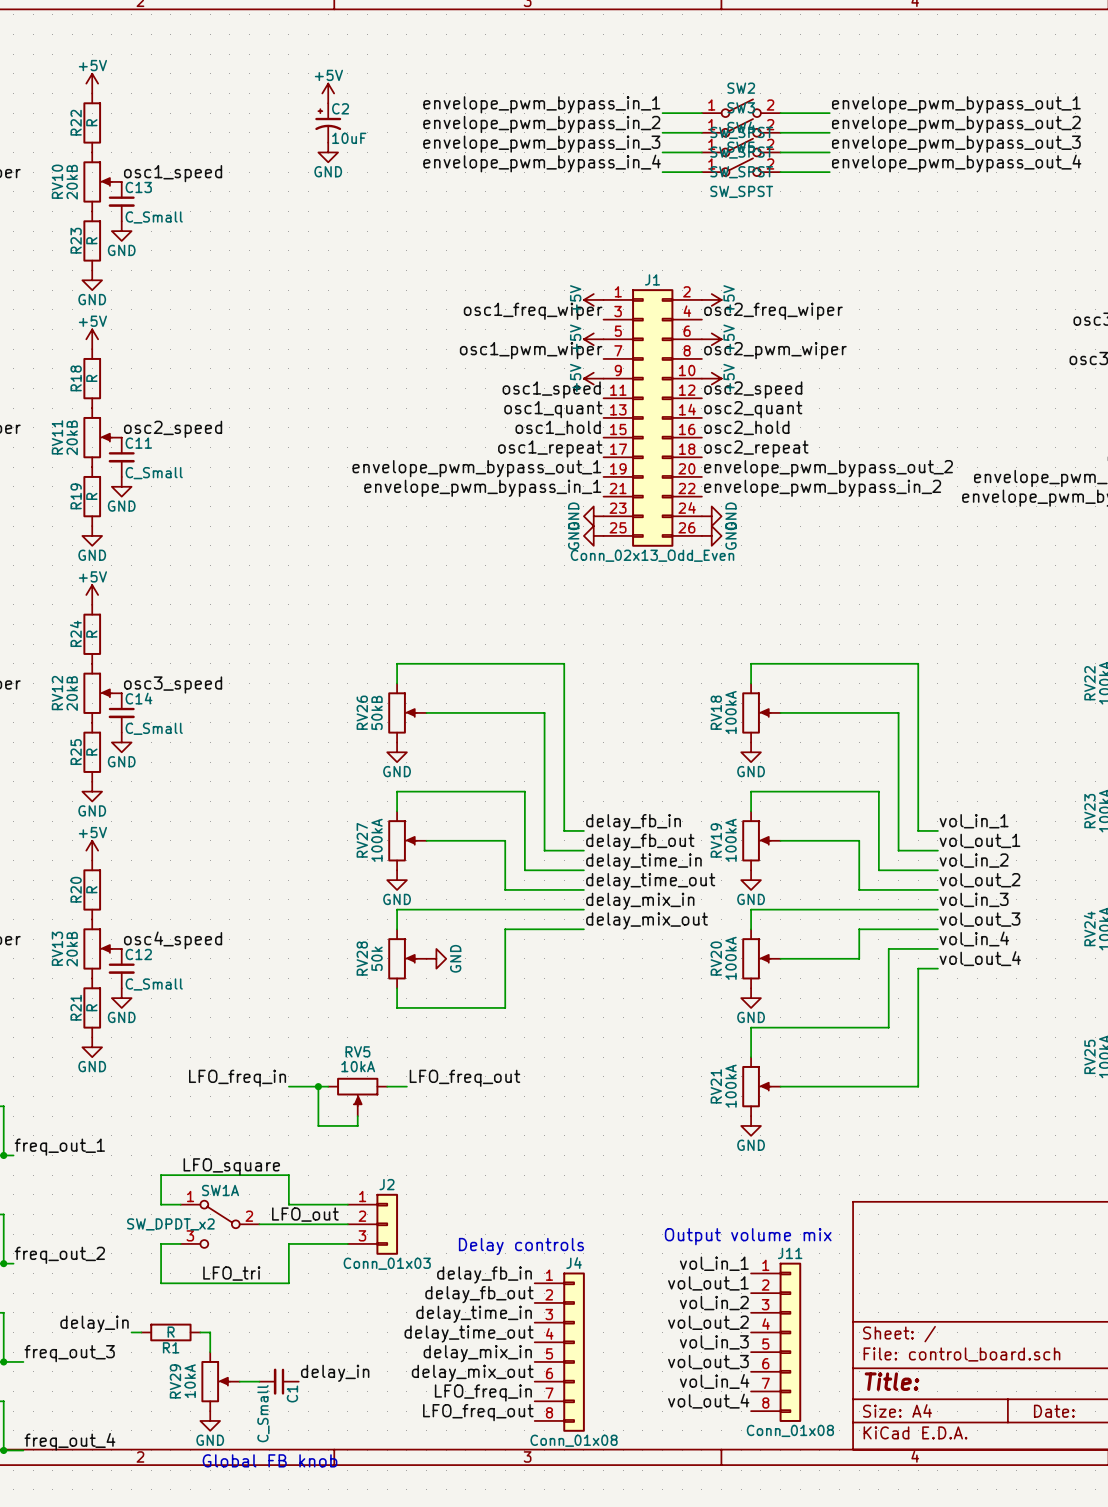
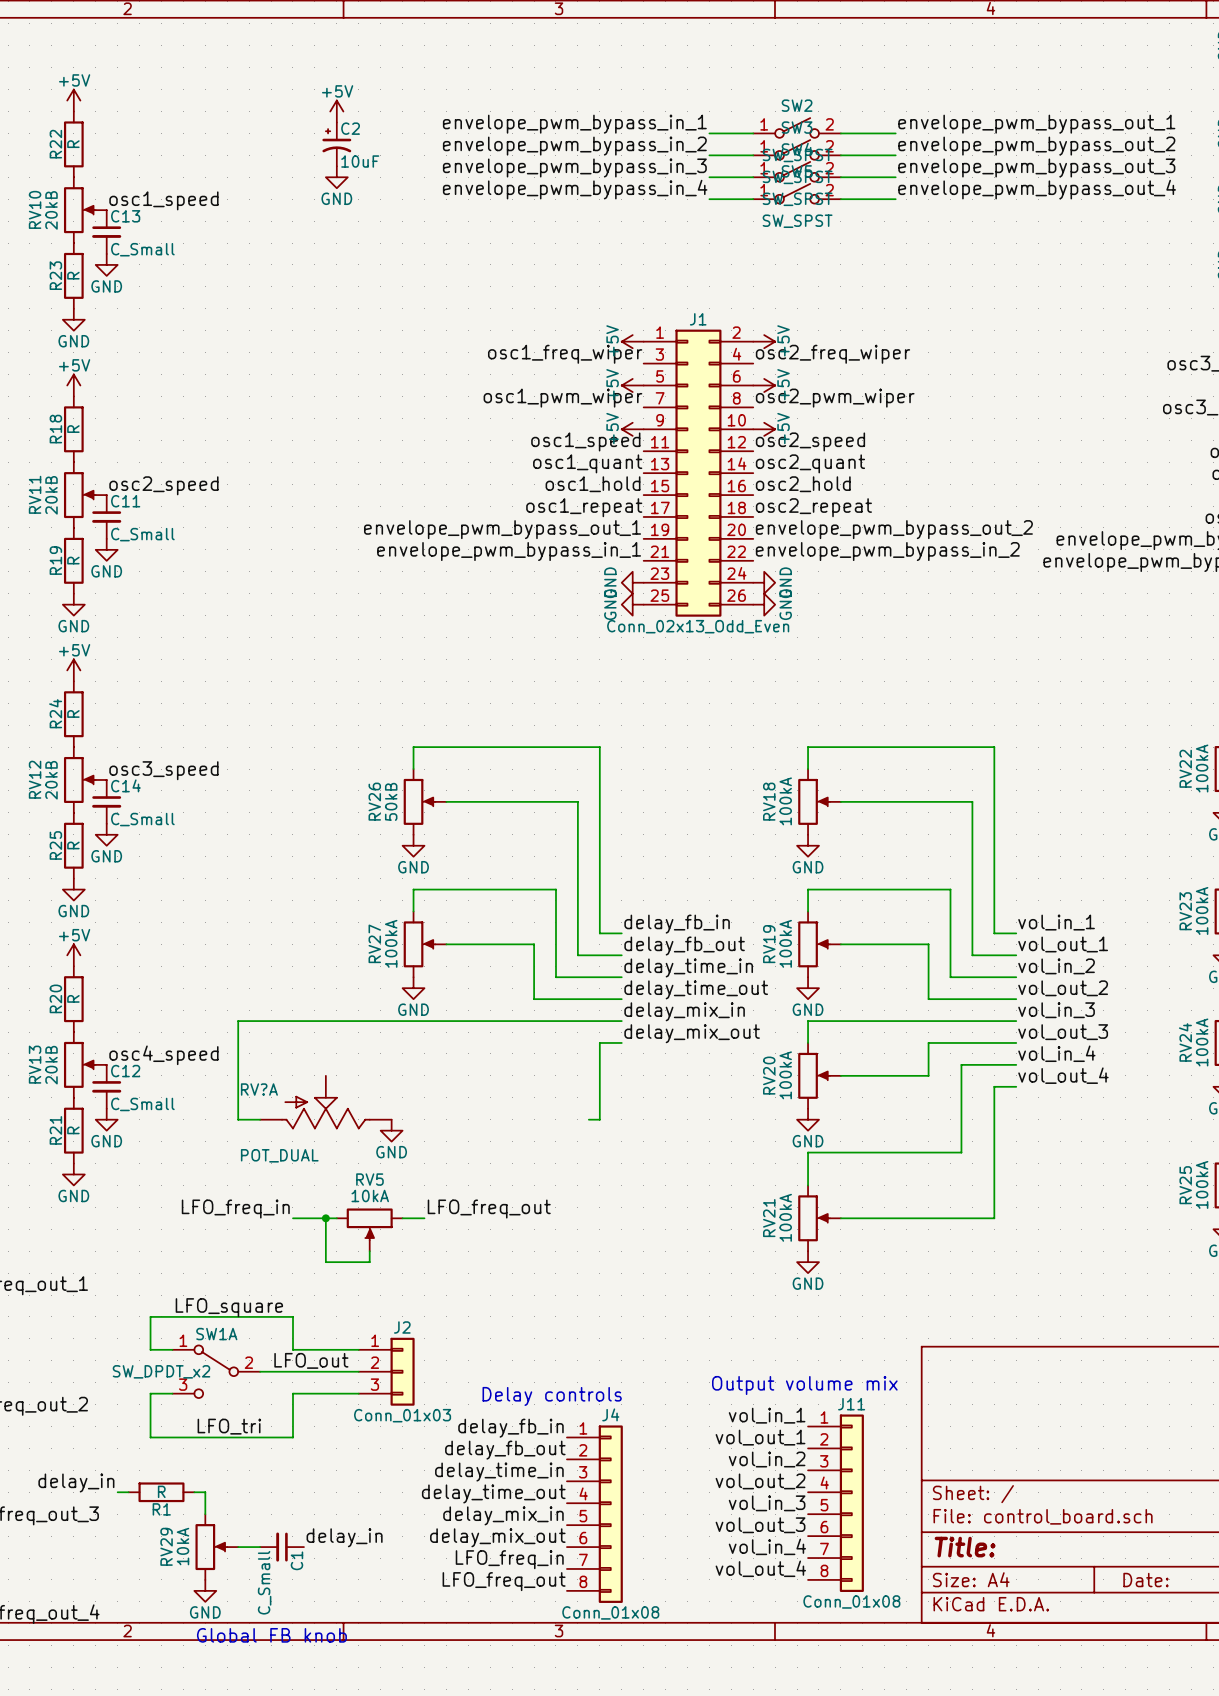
wire: (397, 909) (397, 929) -> (413, 1021) (238, 1021) (238, 1119) (260, 1119)
wire: (564, 929) (505, 929) (505, 1007) (397, 1007) (397, 988) -> (599, 1042) (599, 1119) (588, 1119)
RV28: 50k (407, 958) -> none
power symbol rotation: 0° (436, 958) -> 90° clockwise (391, 1130)
power symbol position: GND (436, 958) -> GND (391, 1130)
RV?A: none -> POT_DUAL (325, 1102)

